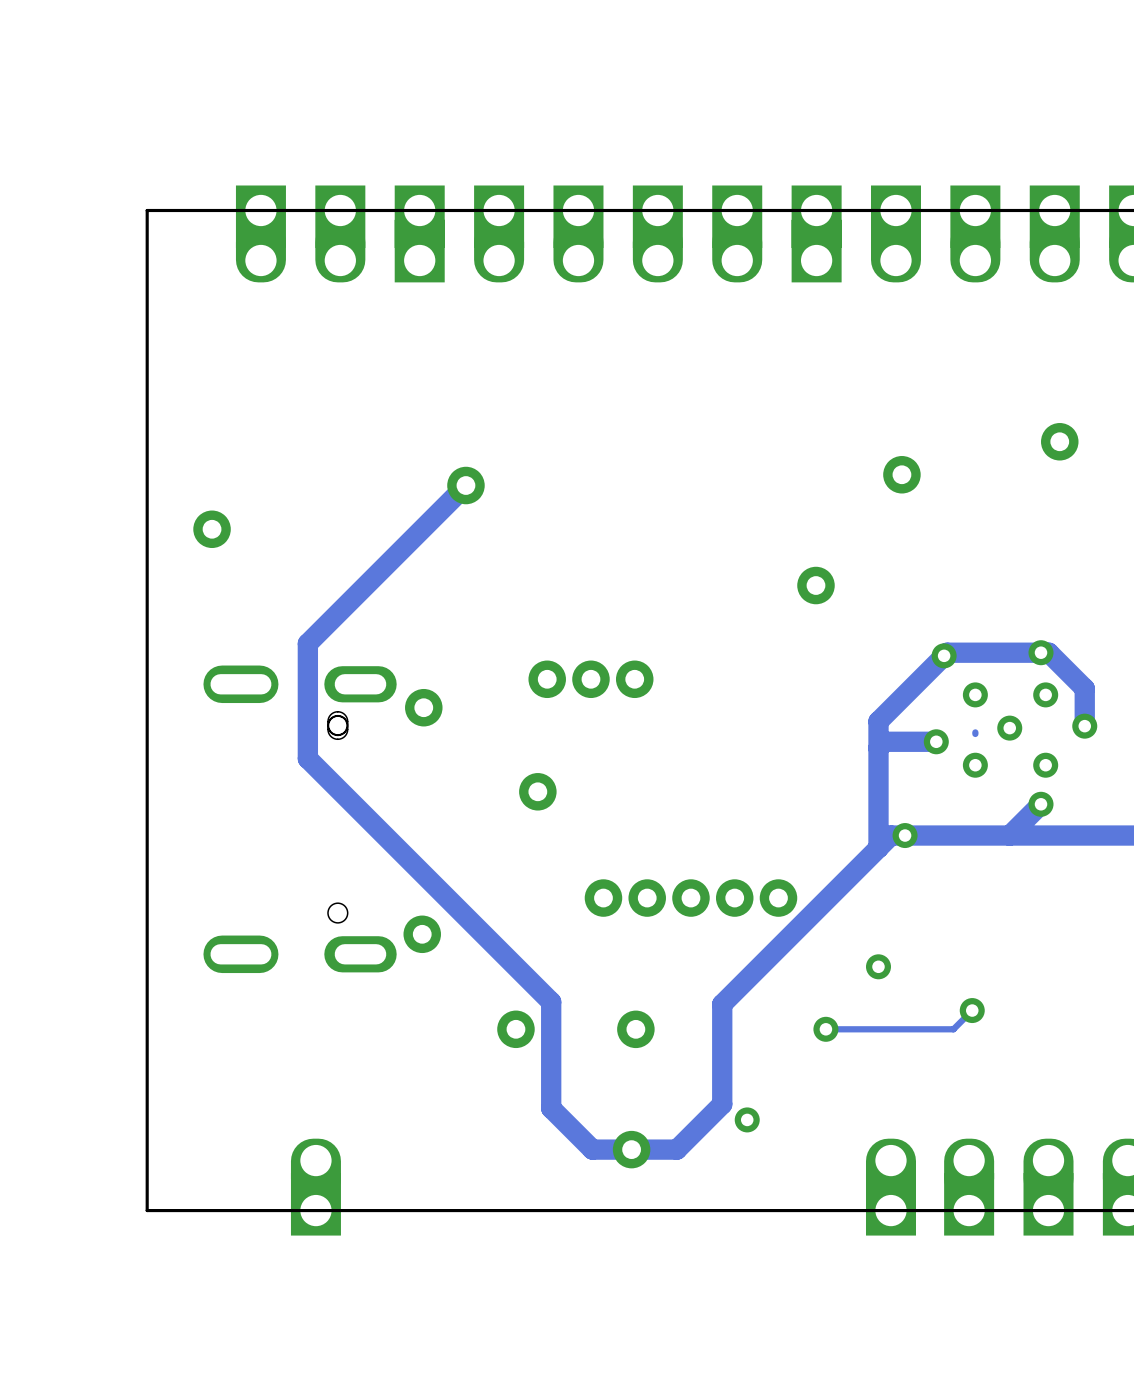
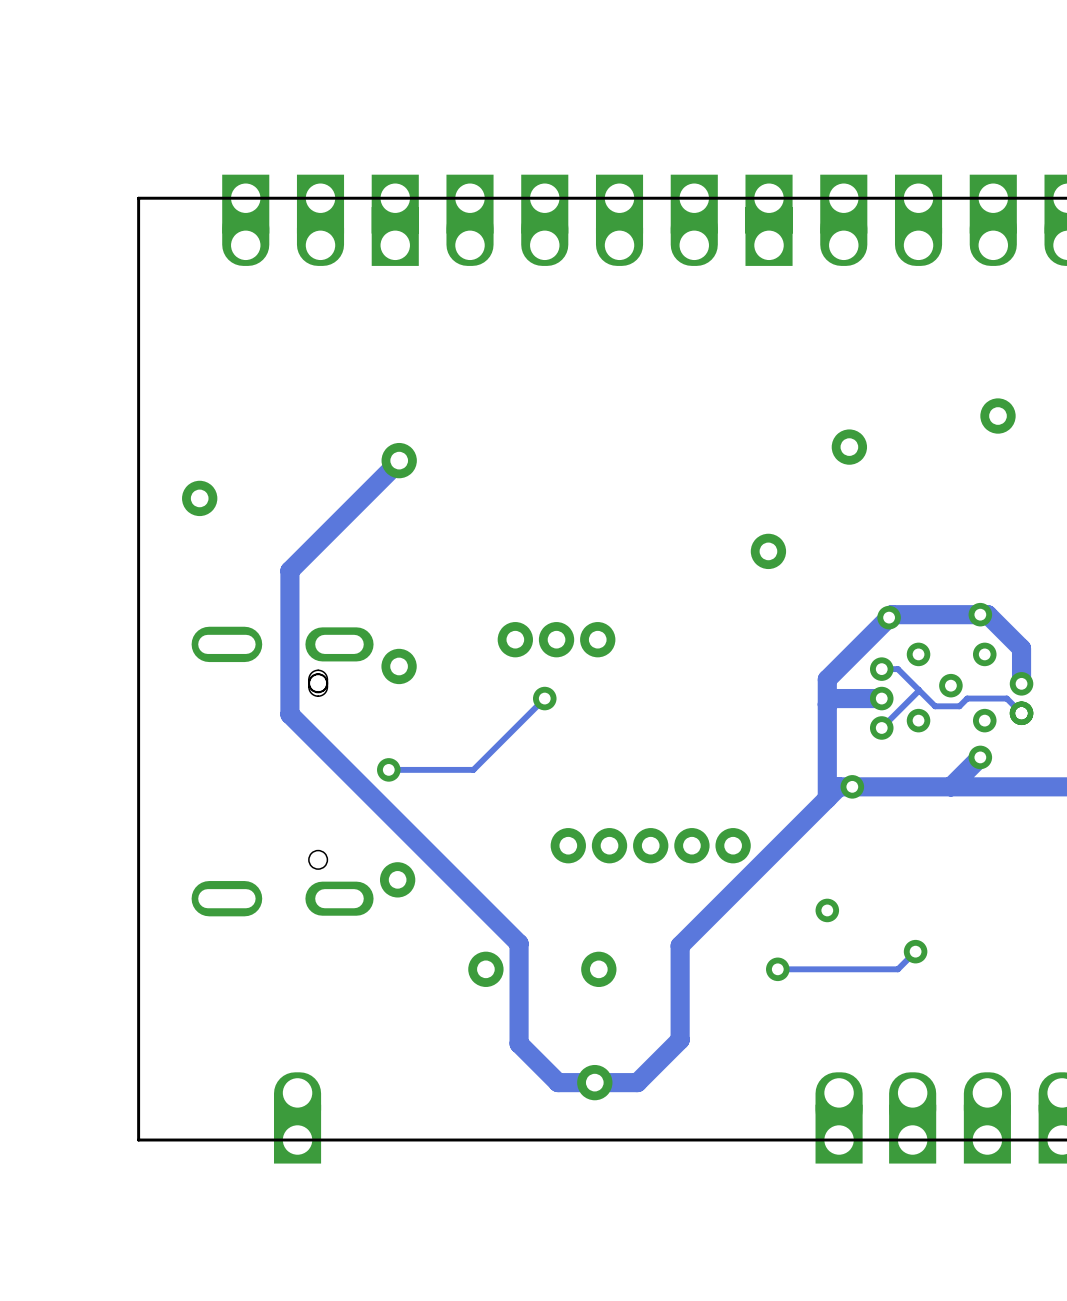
track: (465, 485) (307, 643) -> (399, 460) (289, 570) (289, 606)
via position: (465, 485) -> (399, 460)
track: none -> (881, 669) (897, 669) (935, 706) (959, 706) (967, 698) (1006, 698) (1021, 713)
via: none -> (881, 669)
track: none -> (918, 691) (881, 727)
track: none -> (544, 698) (473, 769) (388, 769)
via: none -> (544, 698)
via: none -> (1021, 713)
via: none -> (881, 727)
via: (537, 791) -> none
via: none -> (388, 769)
via: (747, 1119) -> none

